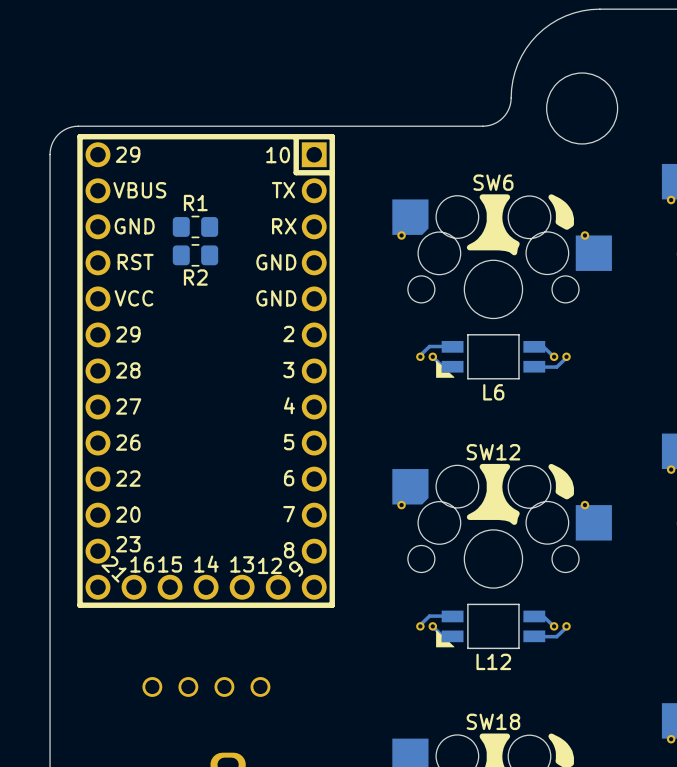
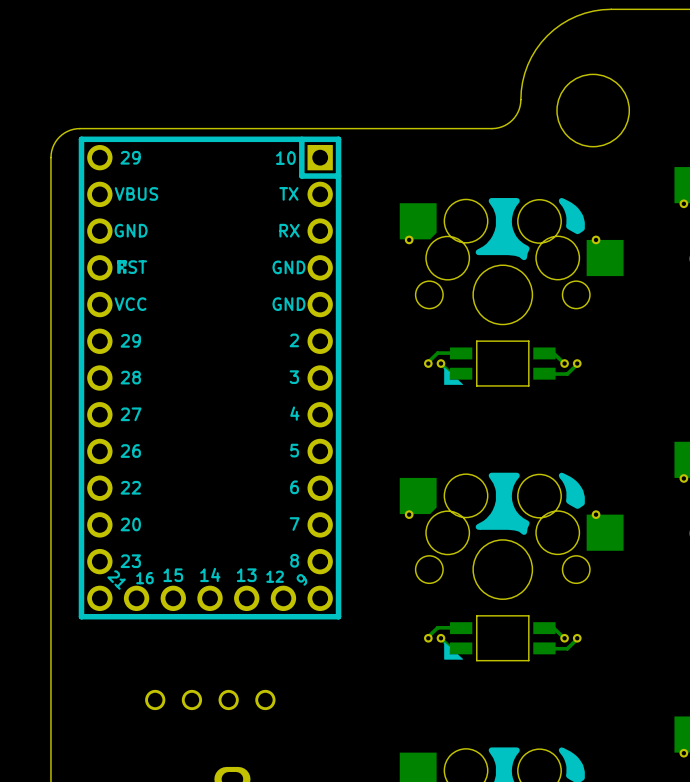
part footprint: [77, 134, 335, 608] -> [78, 136, 342, 620]
SW6 name: SW6 (493, 182) -> none
R1: (195, 226) -> none
R2: (195, 255) -> none
L6: (493, 356) -> none
SW12 name: SW12 (493, 452) -> none
L12: (493, 626) -> none
SW18 name: SW18 (493, 721) -> none

